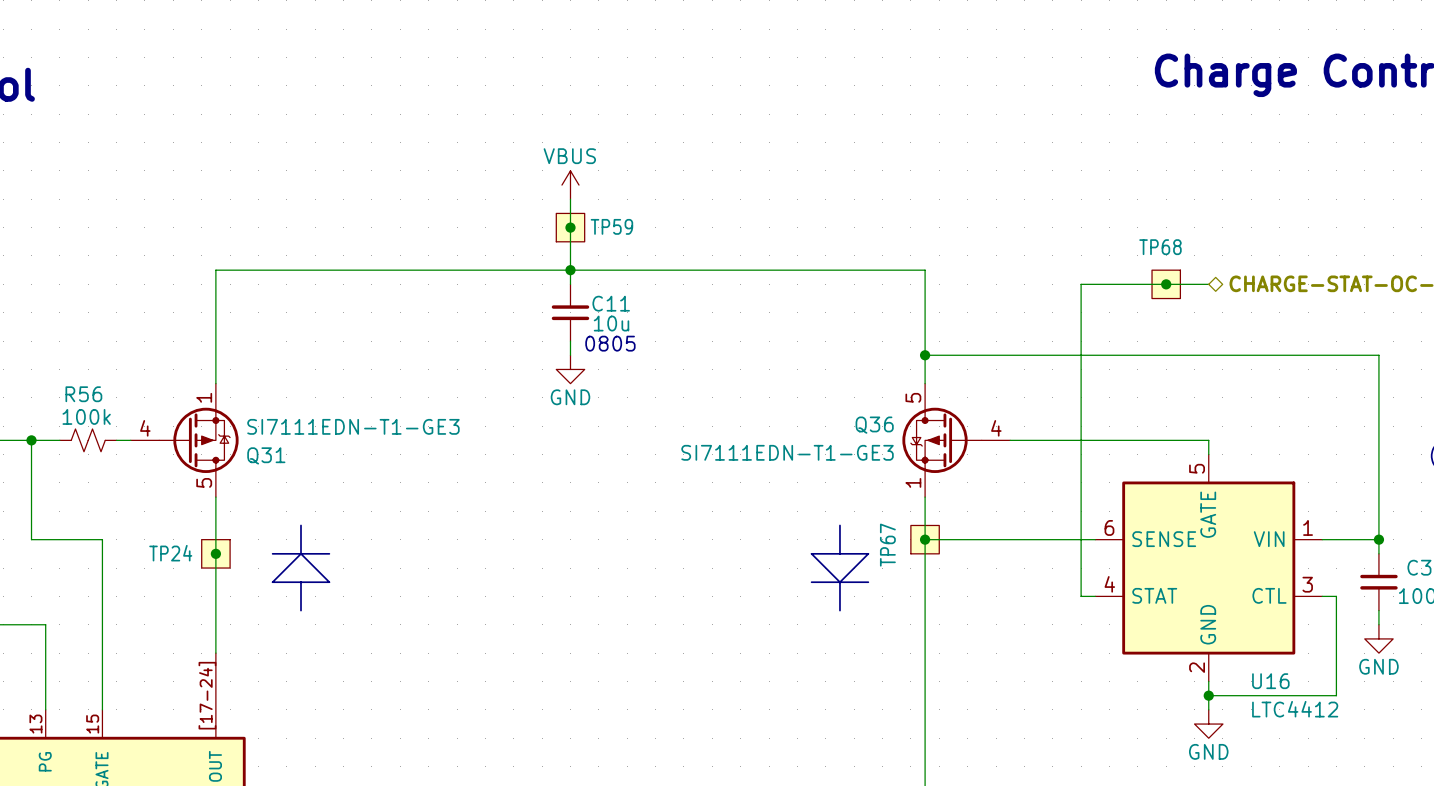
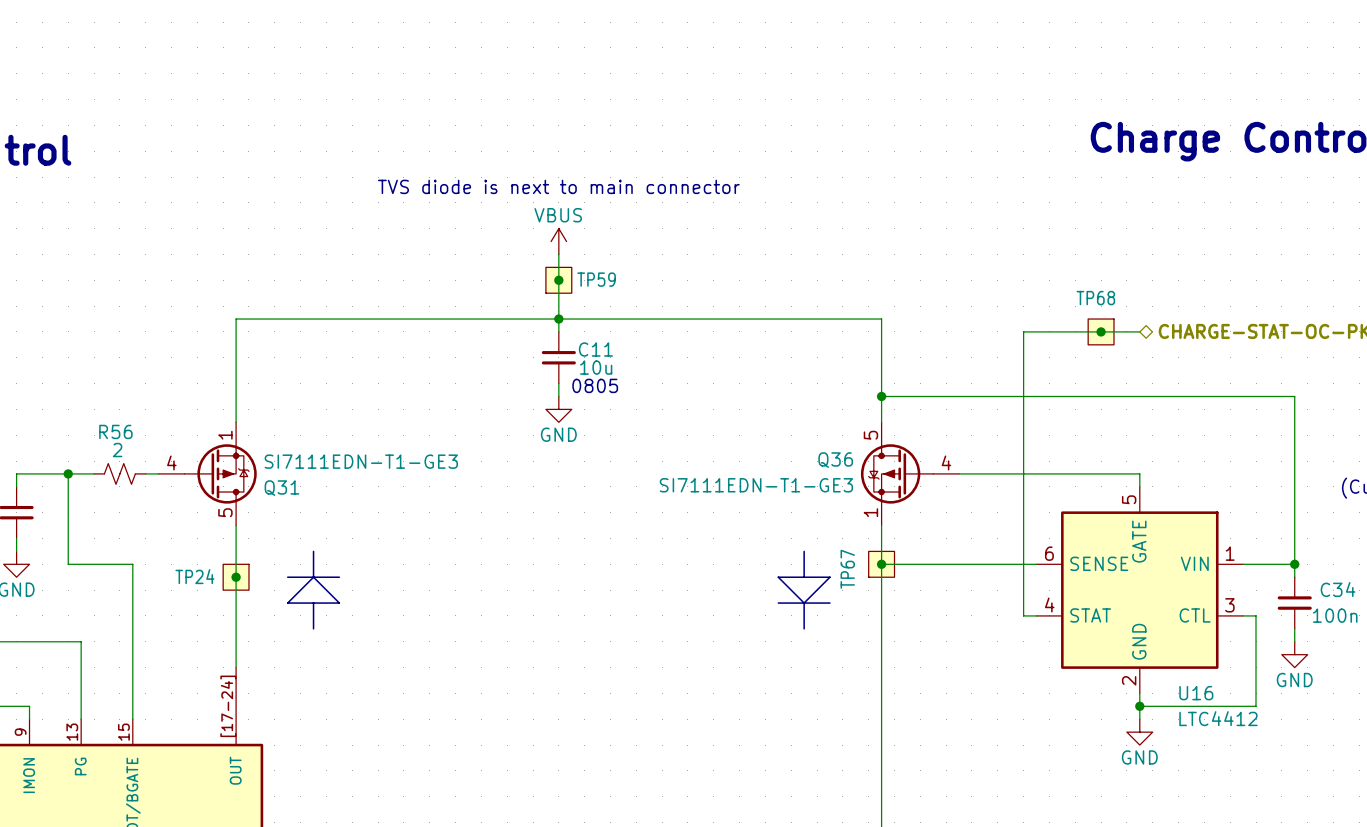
text: none -> TVS diode is next to main connector (558, 186)
R56 value: 100k (86, 416) -> 2 (117, 450)

